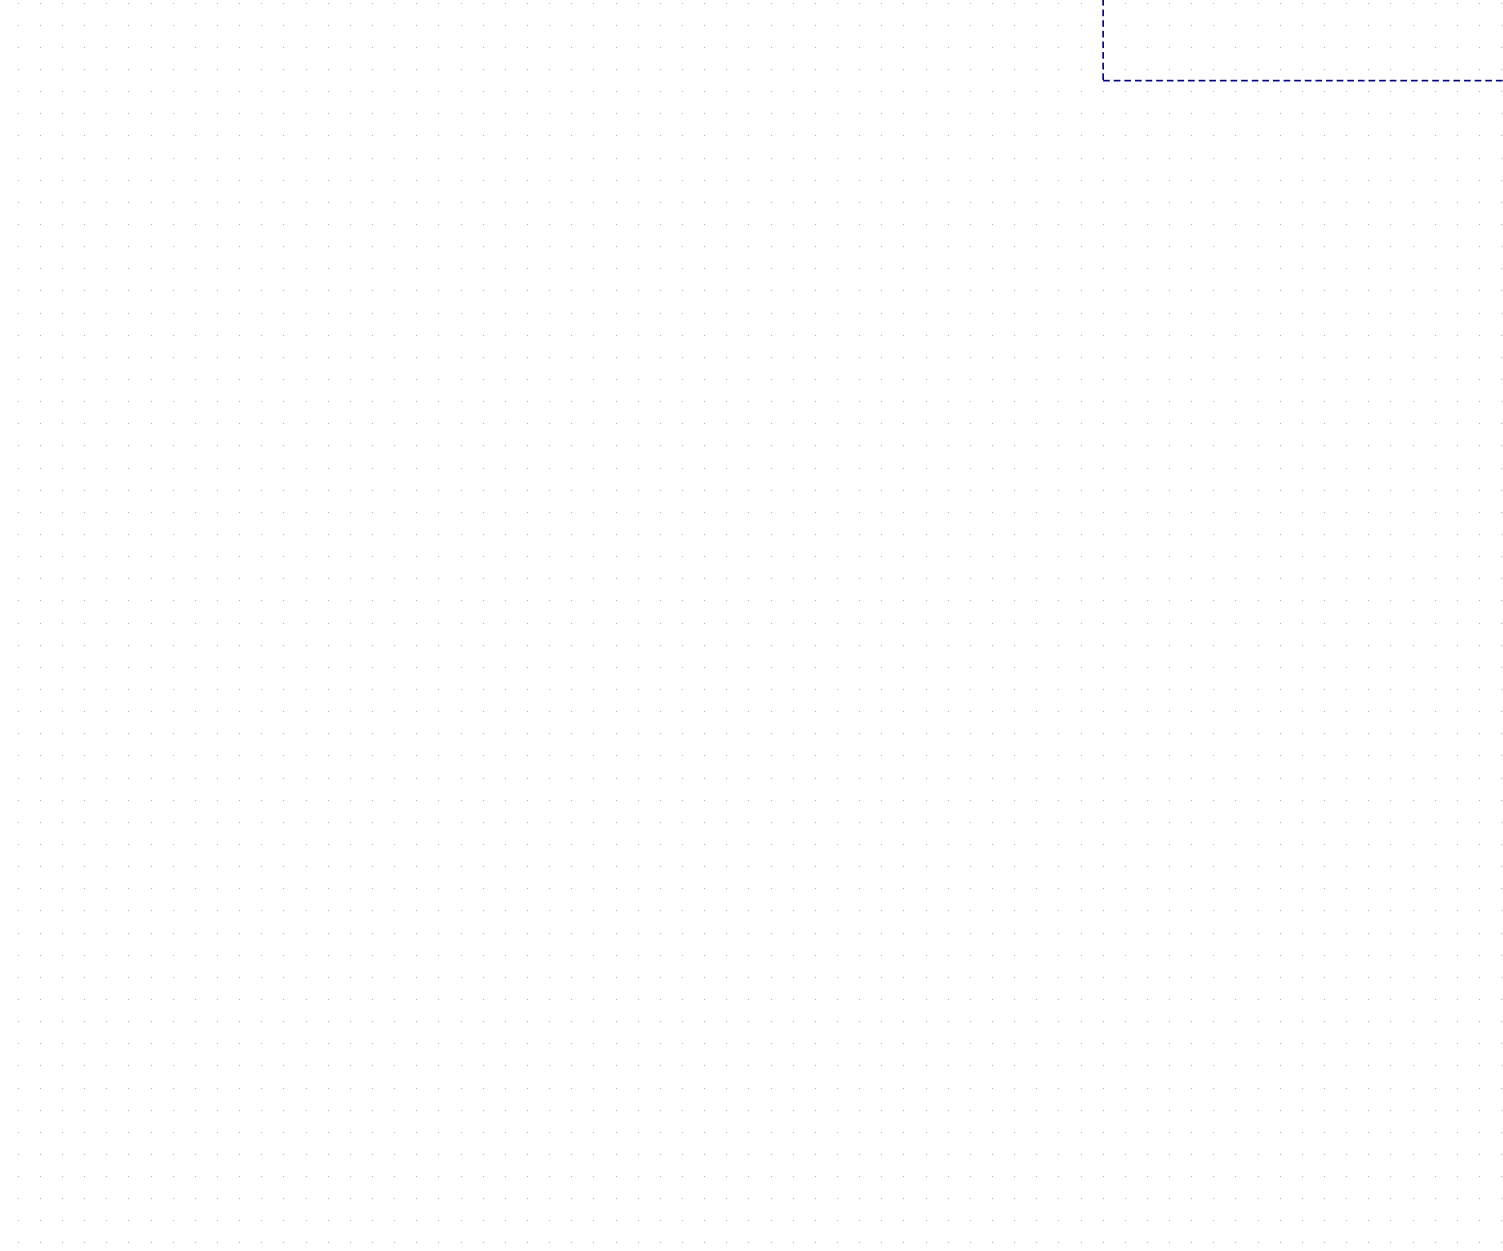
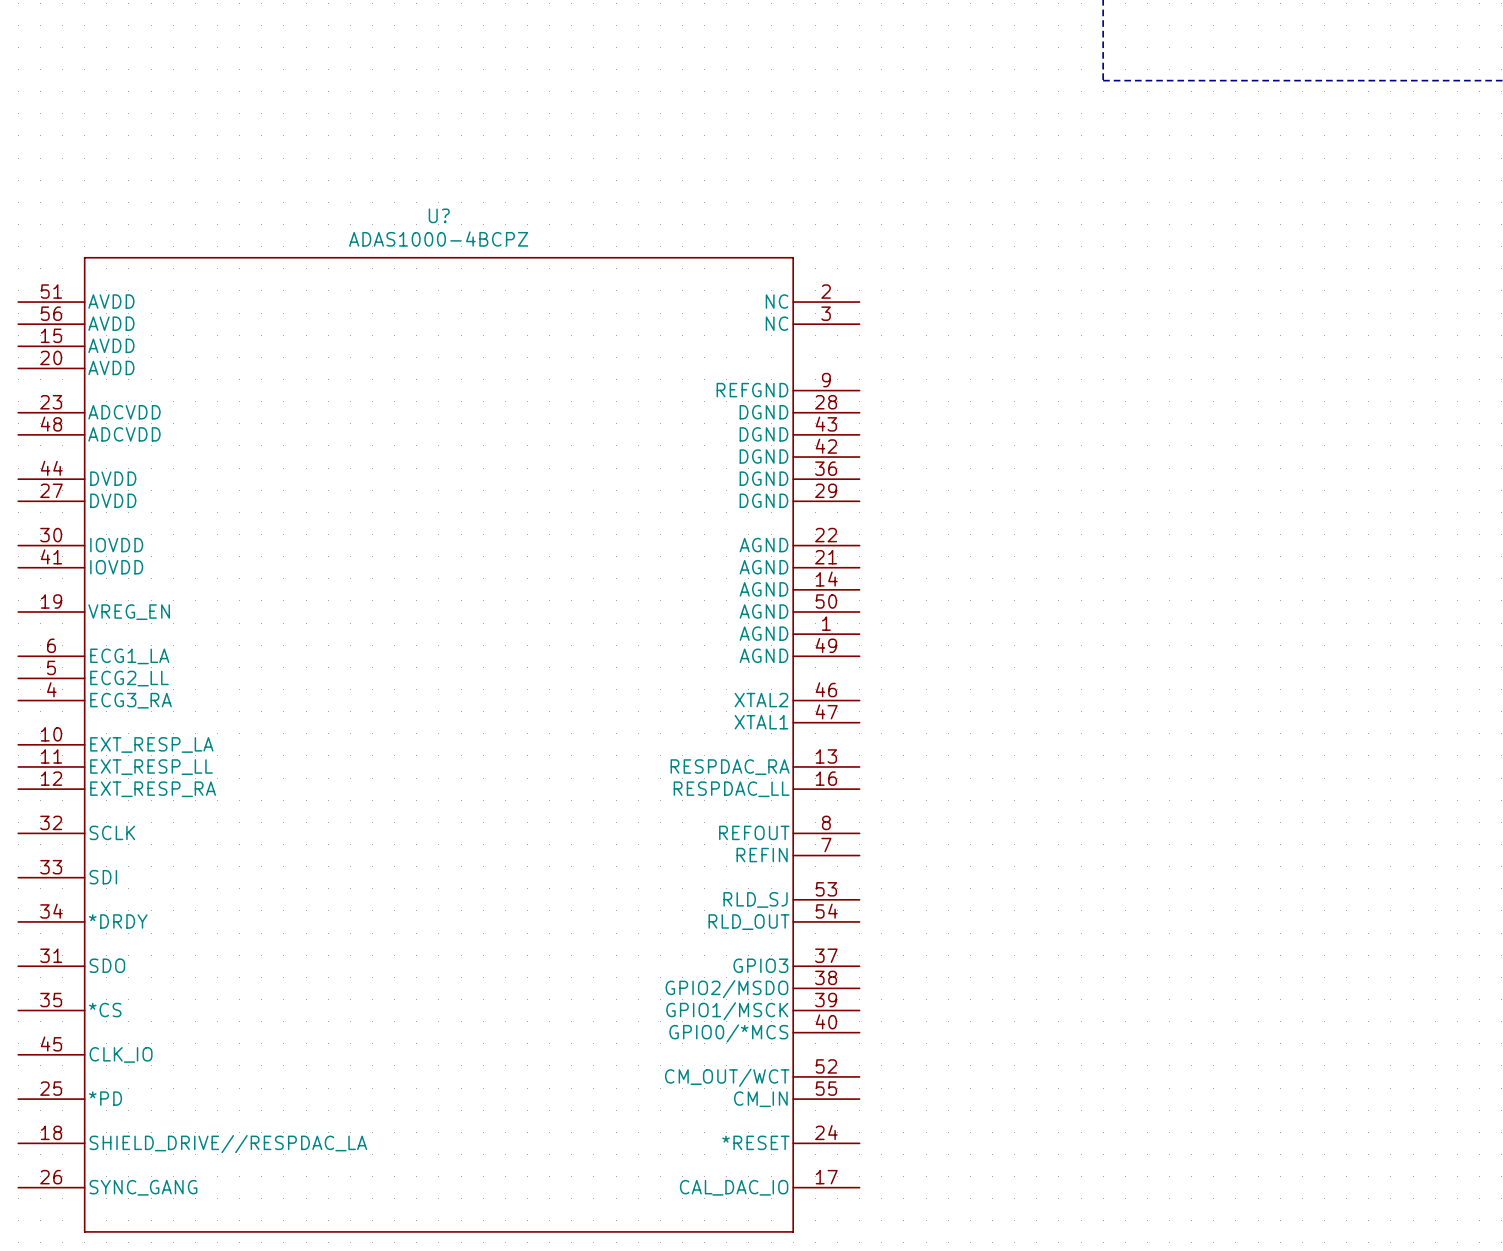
U?: none -> ADAS1000-4BCPZ (438, 744)

